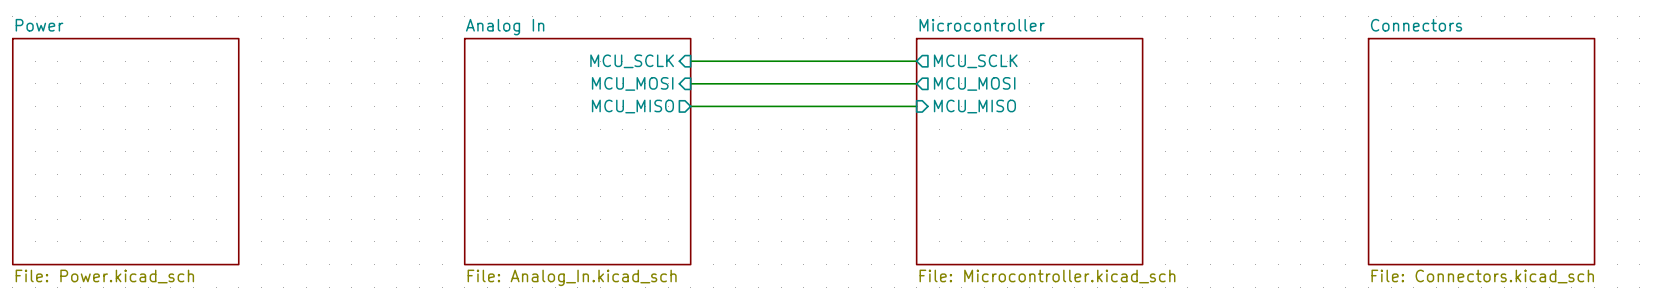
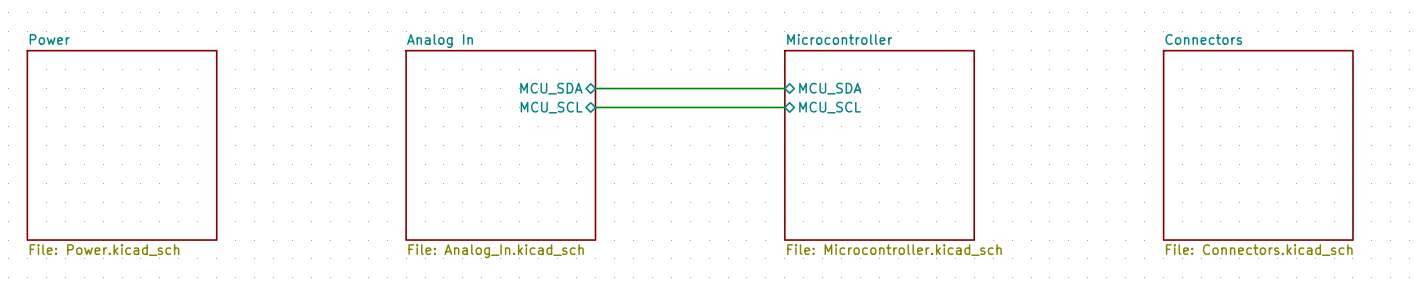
sheet pin: MCU_SCLK (632, 61) -> none
wire: (690, 61) (916, 61) -> none
sheet pin: MCU_SCLK (975, 61) -> none
sheet pin shape: input (632, 83) -> bidirectional (551, 88)
sheet pin: MCU_MOSI (632, 83) -> MCU_SDA (551, 88)
sheet pin shape: output (974, 83) -> bidirectional (830, 88)
sheet pin: MCU_MOSI (974, 83) -> MCU_SDA (830, 88)
sheet pin shape: output (632, 106) -> bidirectional (551, 107)
sheet pin: MCU_MISO (632, 106) -> MCU_SCL (551, 107)
sheet pin shape: input (974, 106) -> bidirectional (830, 107)
sheet pin: MCU_MISO (974, 106) -> MCU_SCL (830, 107)

